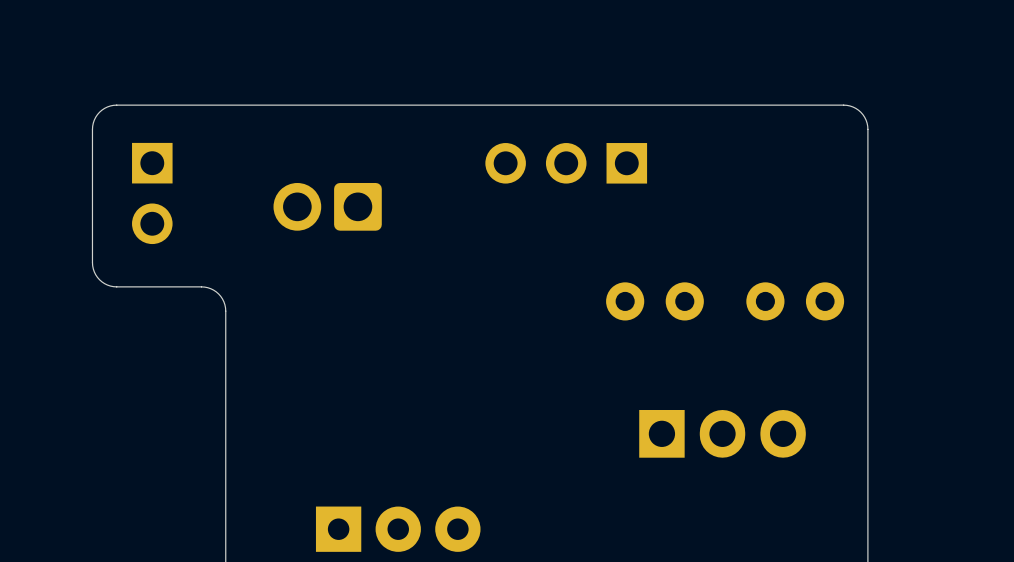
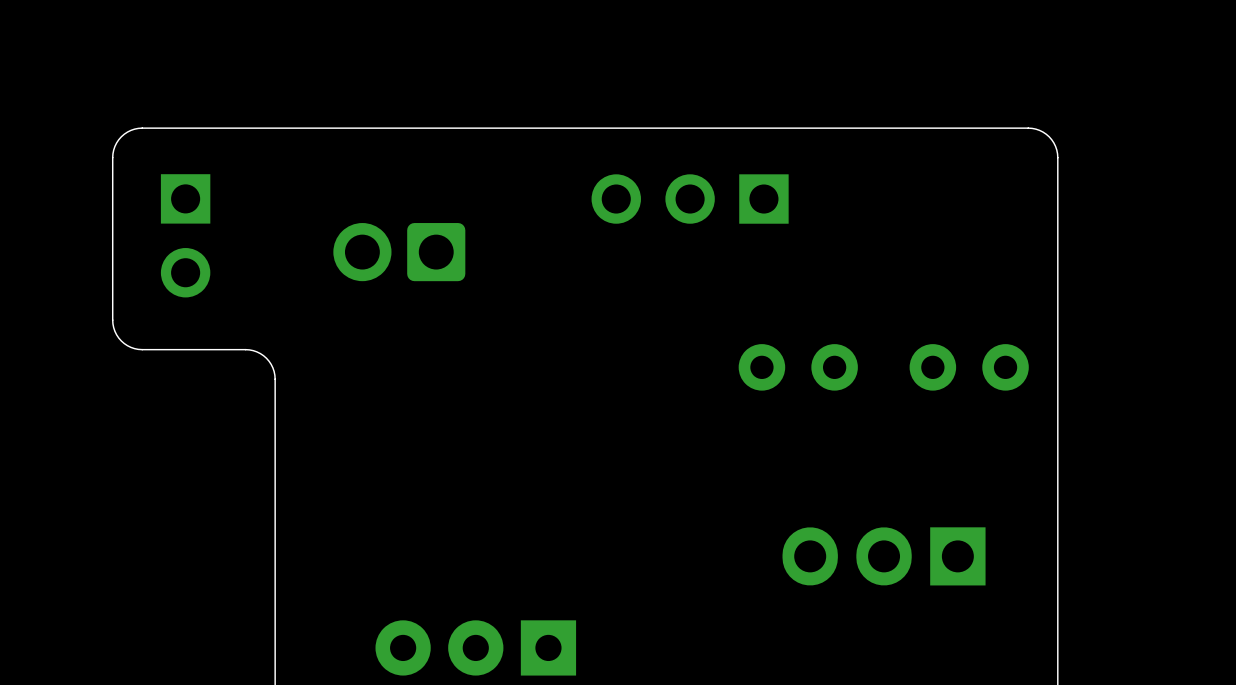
part rotation: 0° (722, 433) -> 180° (884, 556)
part rotation: 0° (398, 529) -> 180° (475, 647)

